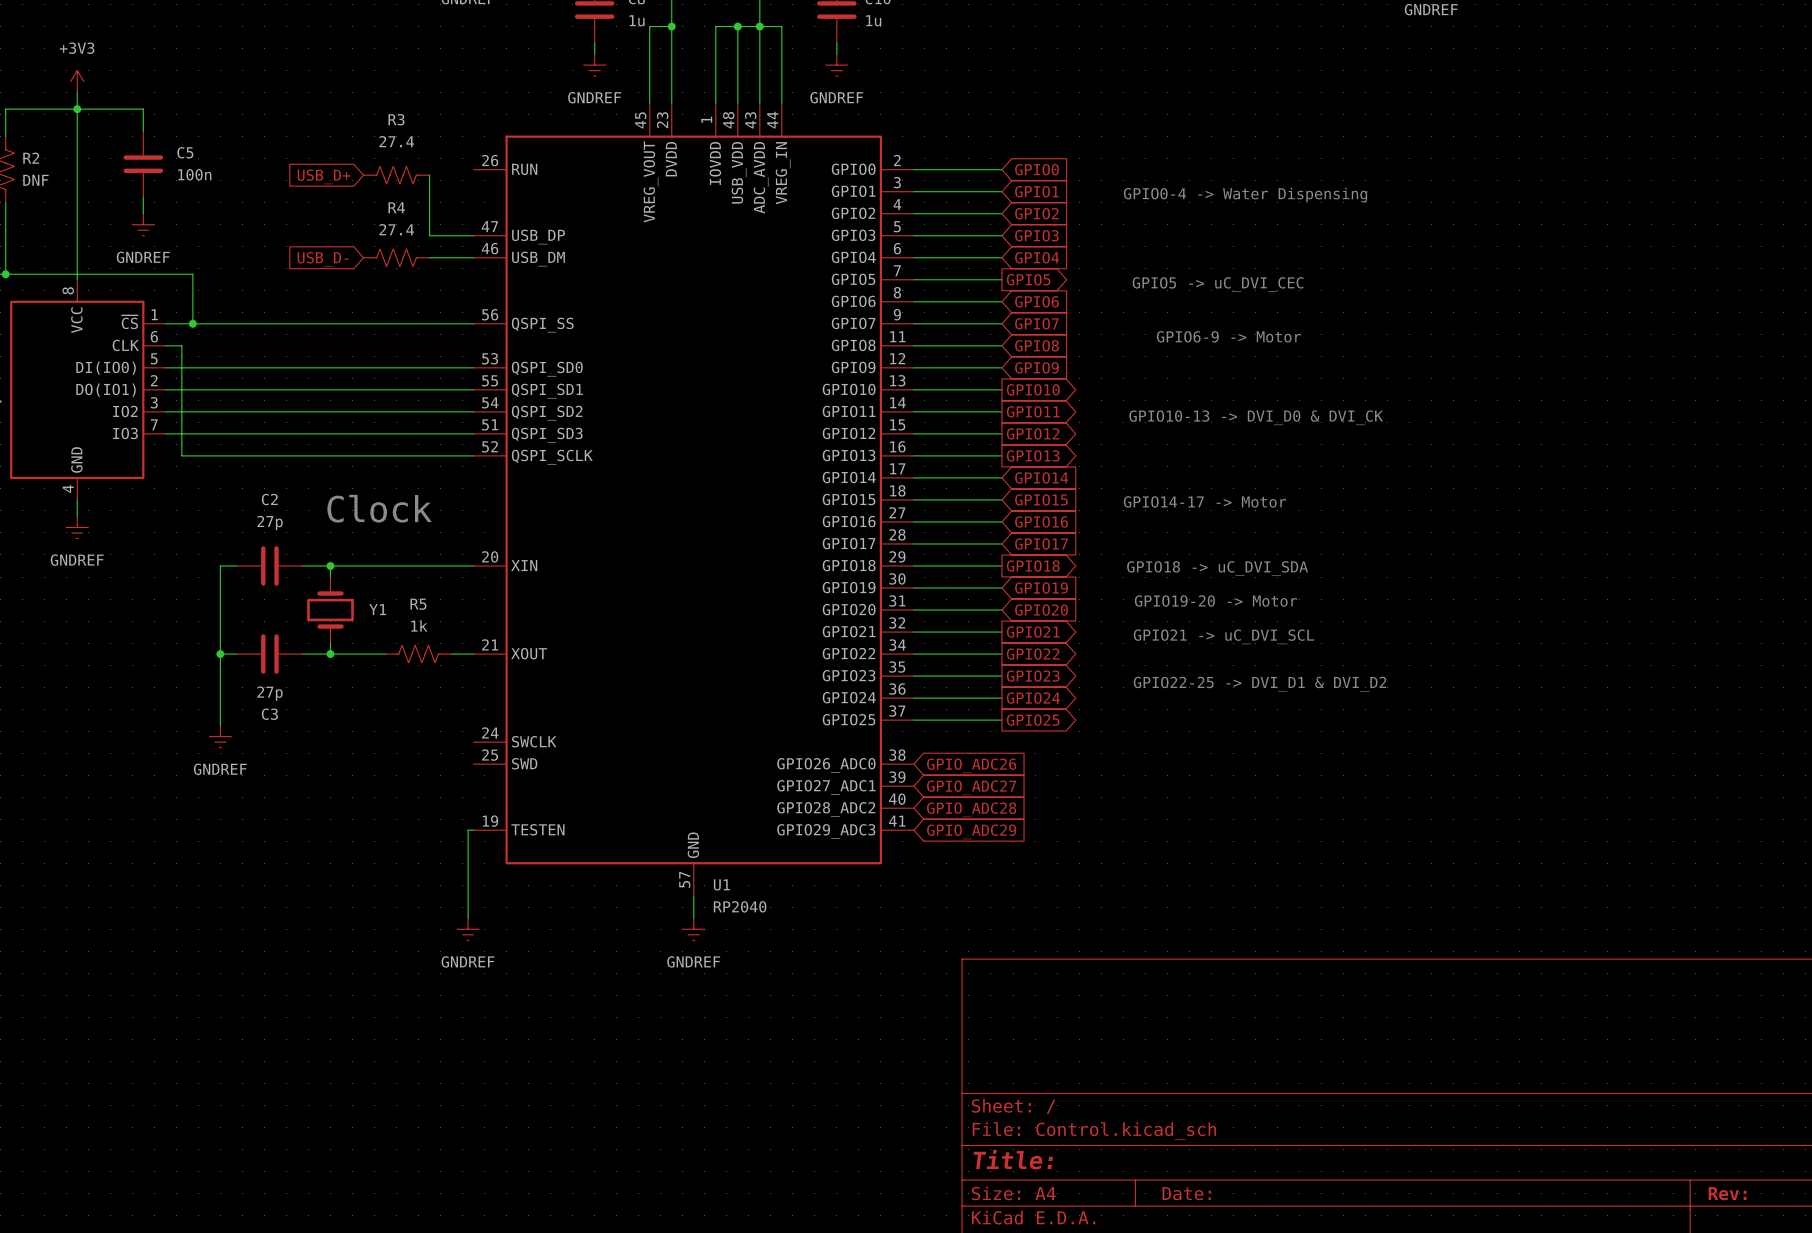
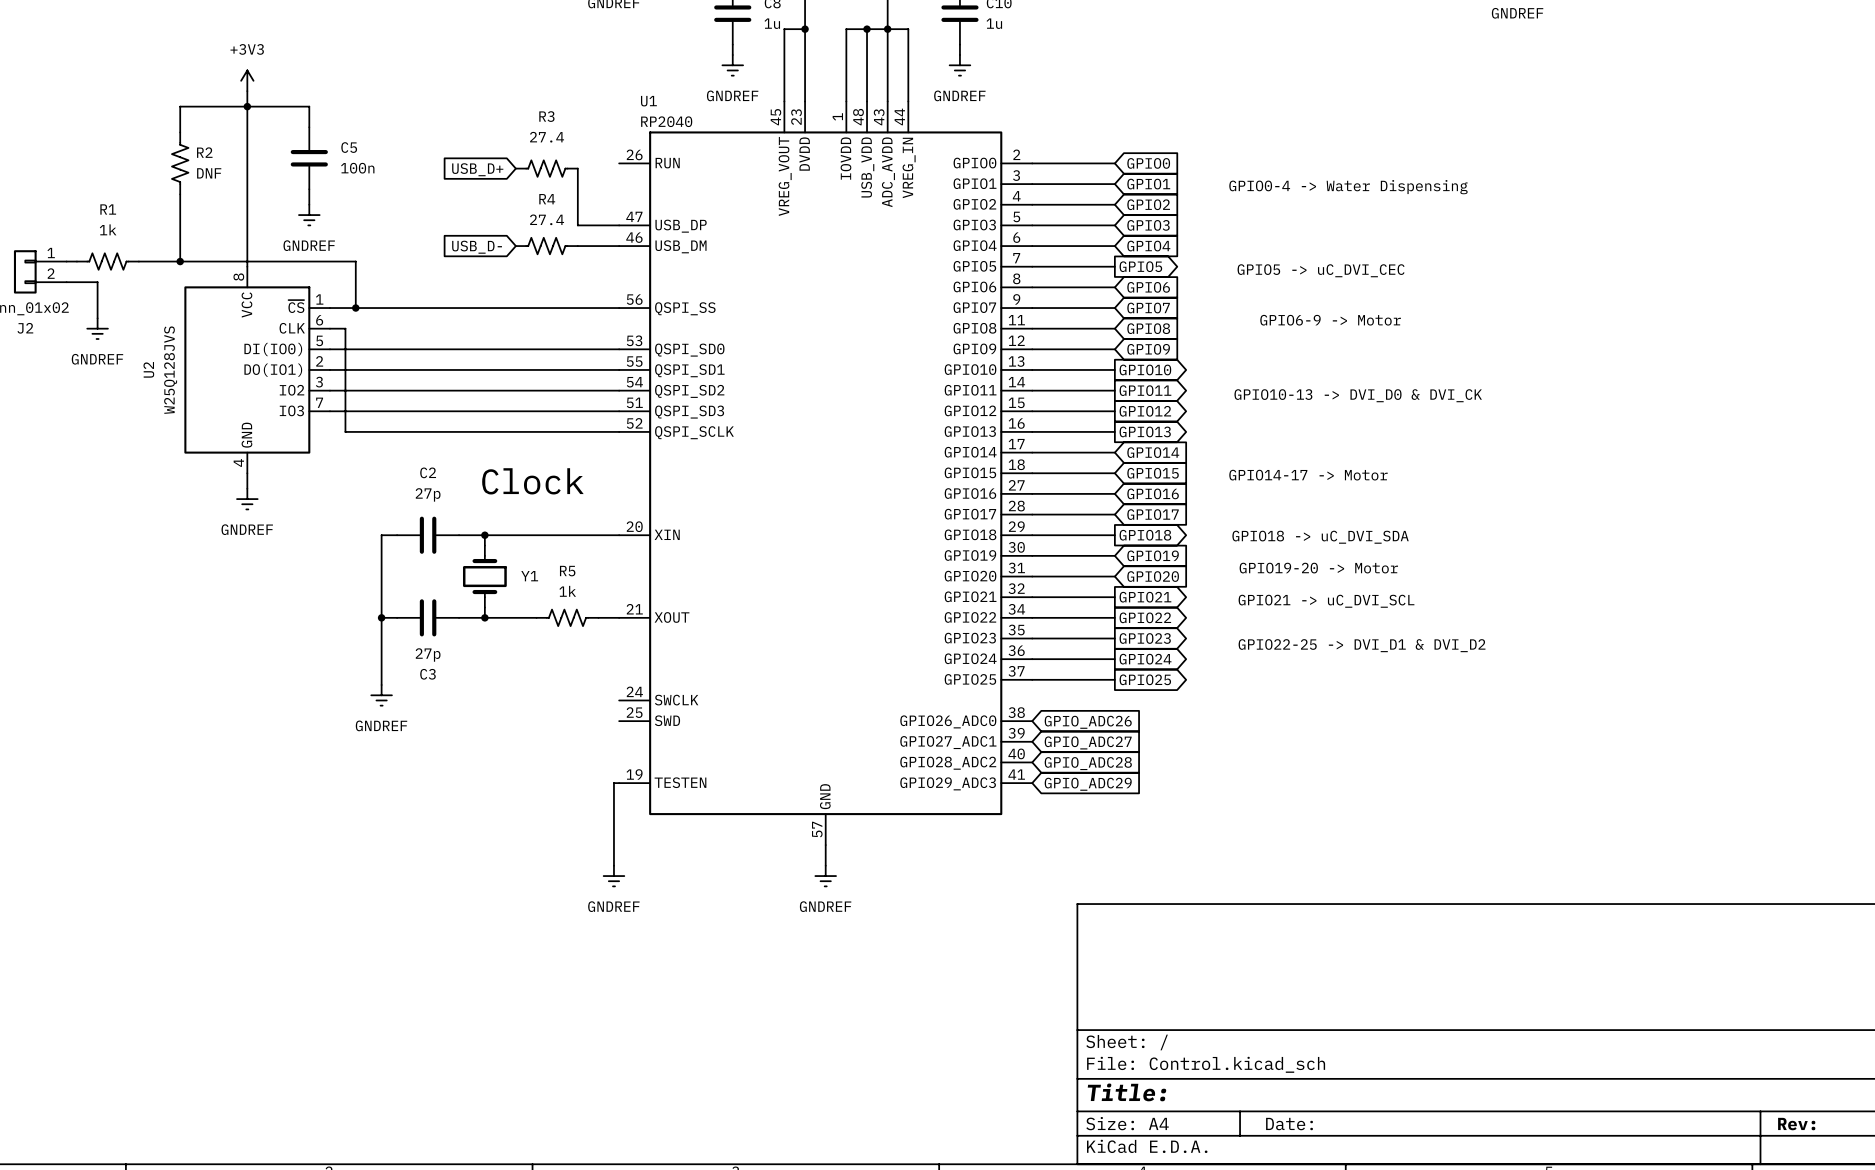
U1 name position: U1 (721, 884) -> U1 (648, 101)
U1 value position: RP2040 (740, 906) -> RP2040 (666, 121)

